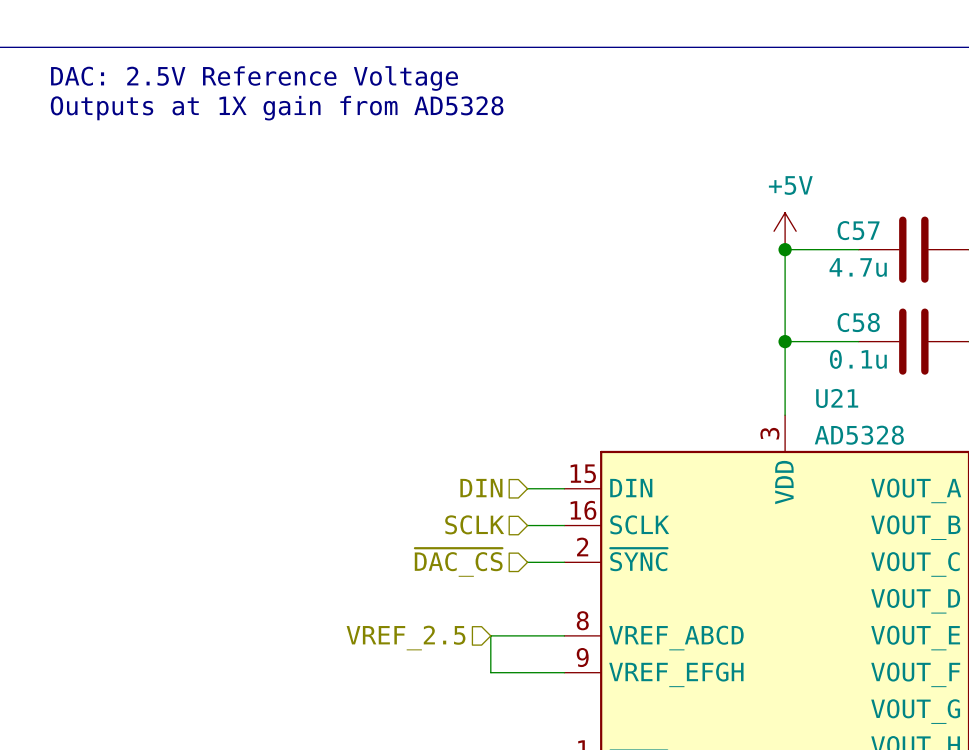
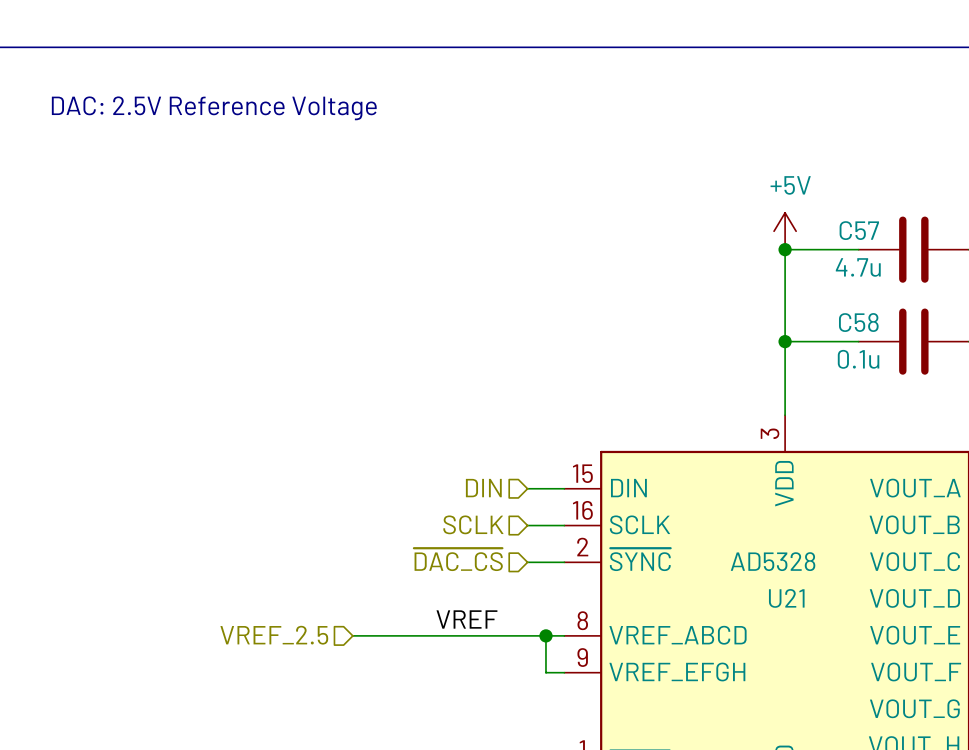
text: DAC: 2.5V Reference Voltage (254, 78) -> none
text: Outputs at 1X gain from AD5328 (277, 108) -> DAC: 2.5V Reference Voltage (214, 108)
U21 name position: U21 (837, 398) -> U21 (786, 598)
U21 value position: AD5328 (859, 435) -> AD5328 (773, 561)
label: none -> VREF (466, 619)
wire: none -> (352, 635) (490, 635)
wire: (490, 635) (490, 672) (545, 672) -> (545, 635) (545, 672)
junction: none -> (545, 635)
hierarchical label position: VREF_2.5 (406, 638) -> VREF_2.5 (274, 635)

